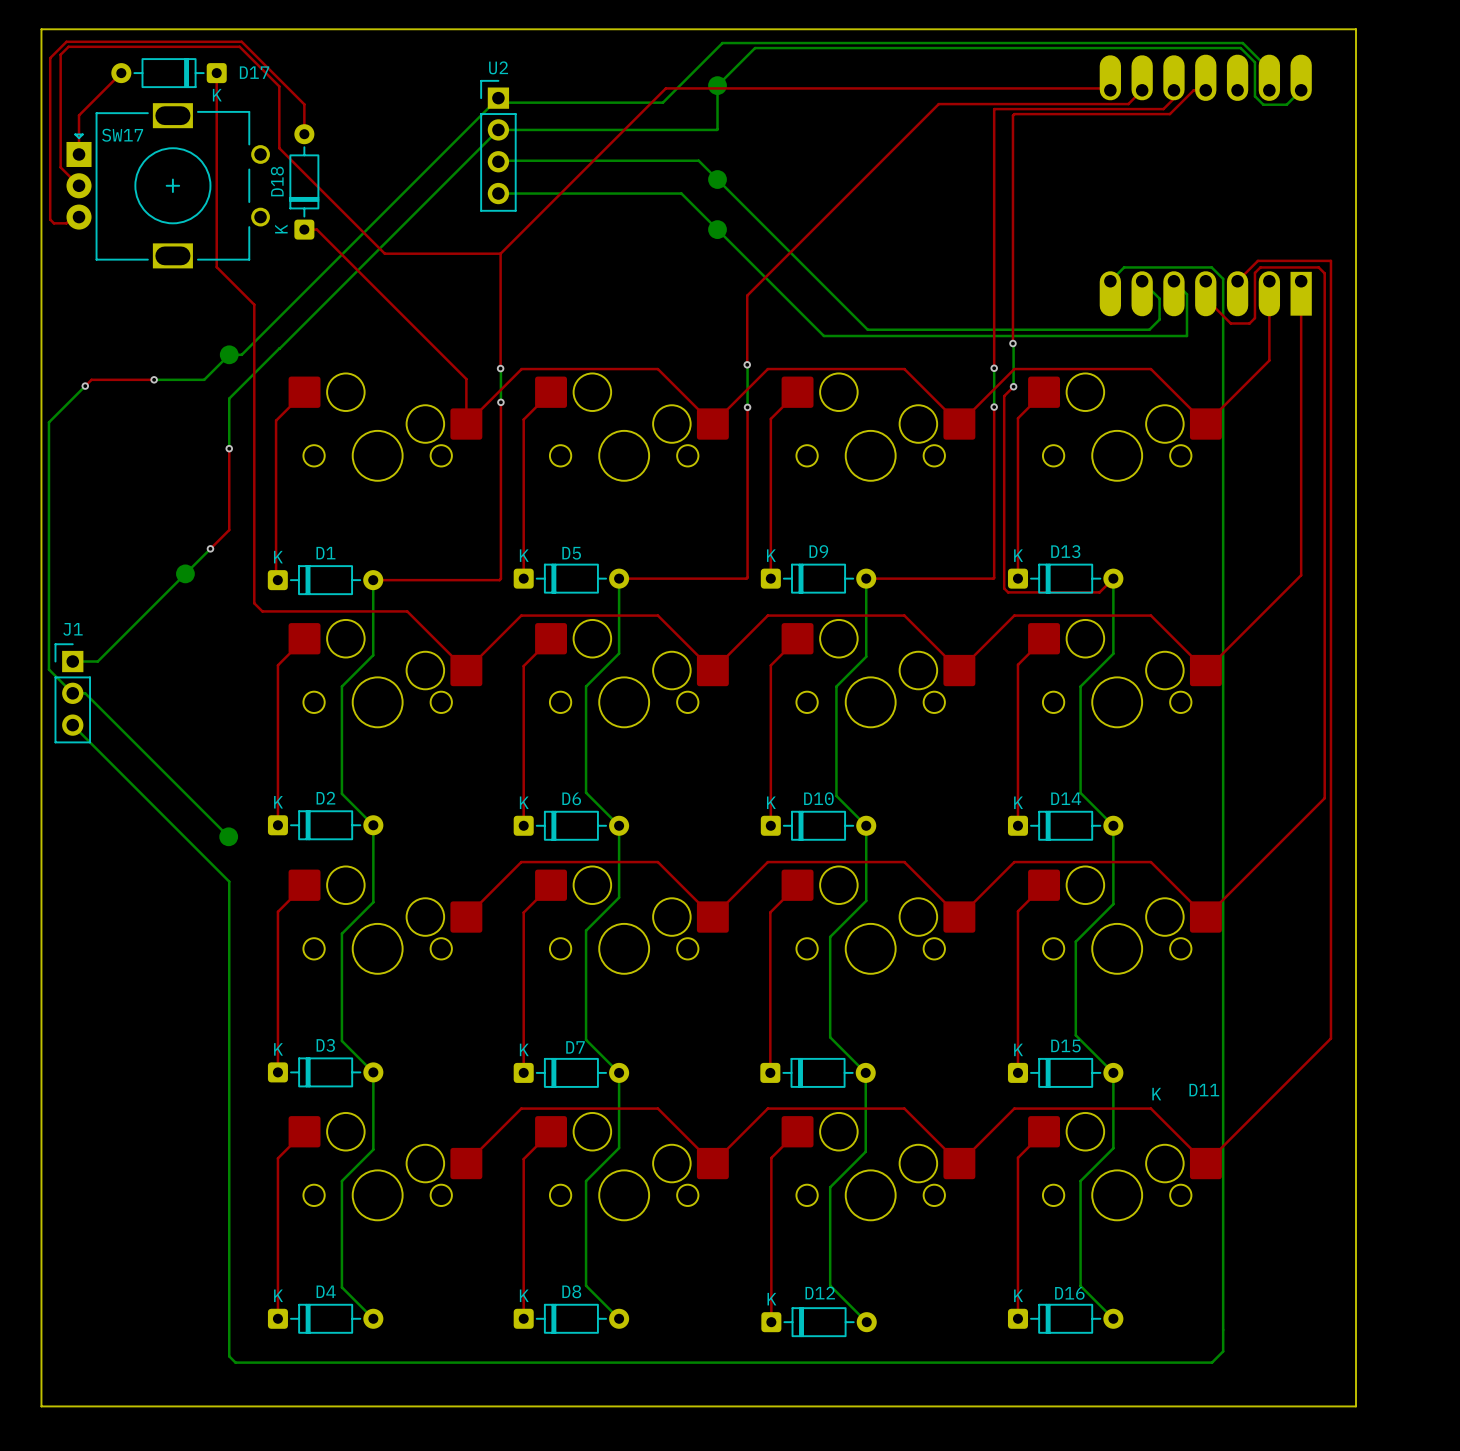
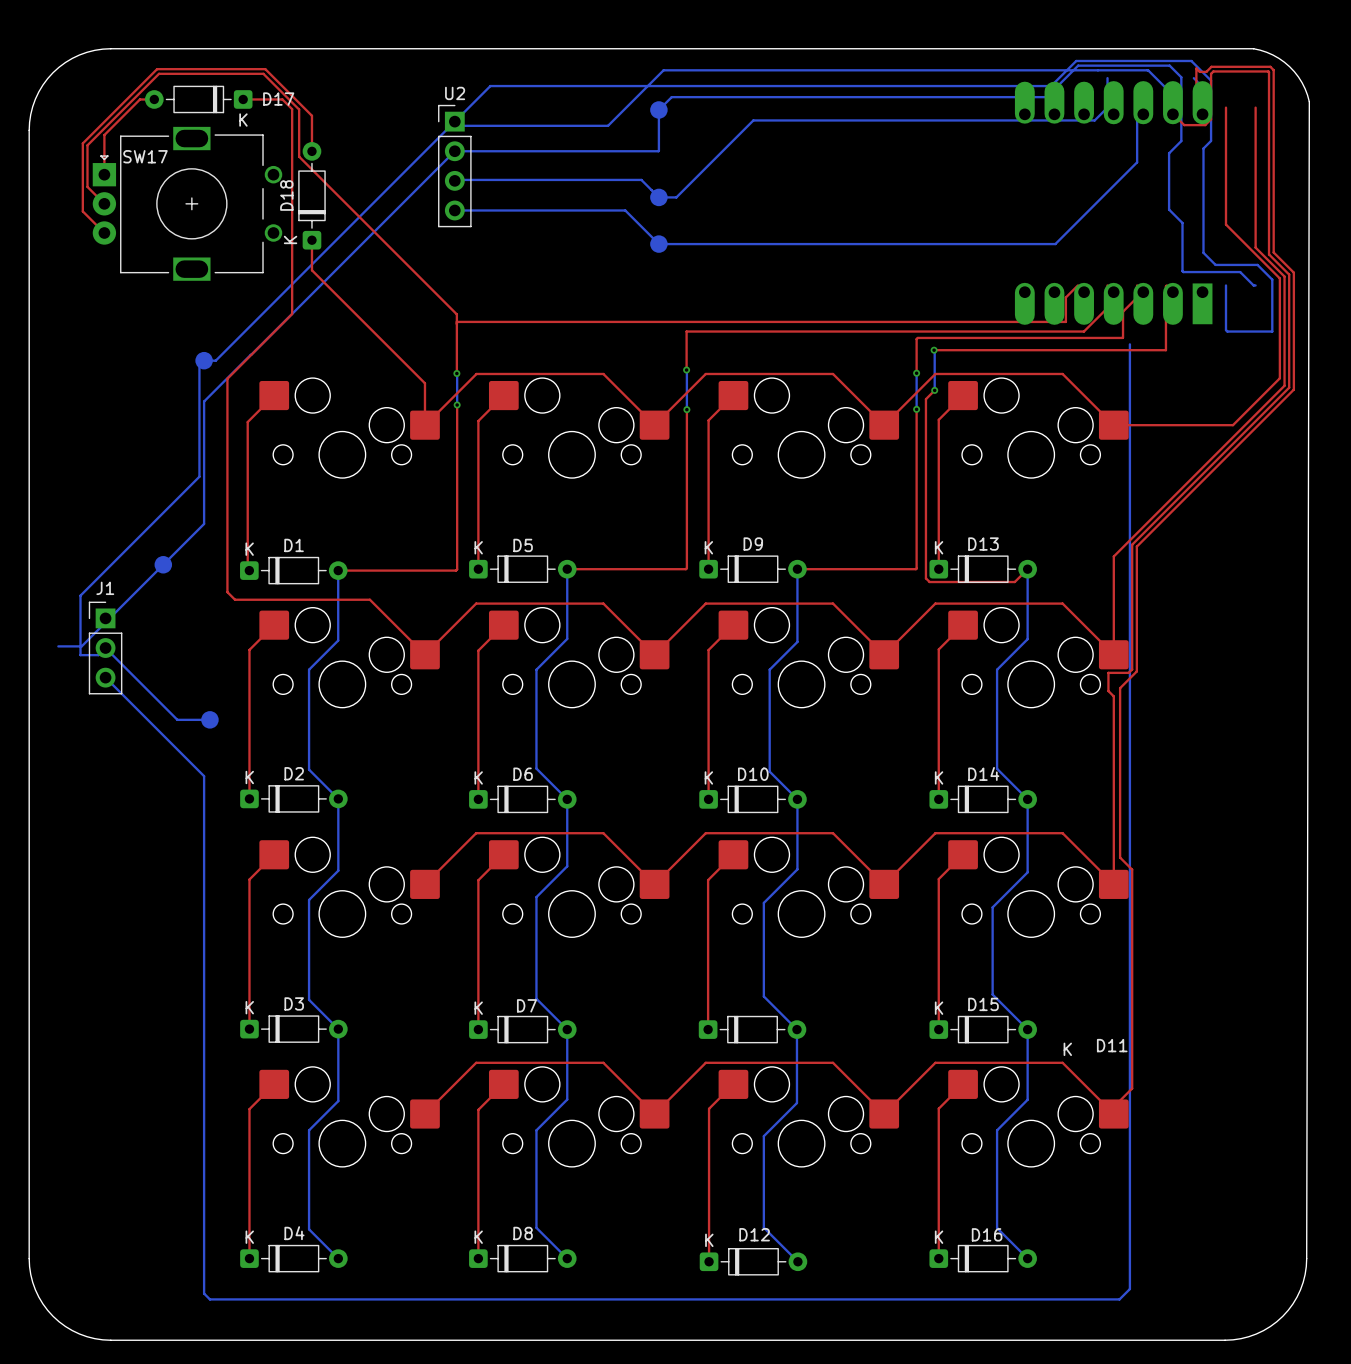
top track: (178, 41) (66, 41) (50, 58) (50, 219) (53, 223) (66, 223) (72, 217) (79, 217) -> (157, 69) (82, 143) (82, 211) (104, 232)
top track: (241, 41) (304, 104) (304, 134) -> (215, 69) (265, 69) (311, 115) (311, 151)
top track: (180, 46) (68, 46) (60, 54) (60, 167) (79, 185) -> (159, 73) (87, 145) (87, 186) (104, 203)
top track: (239, 46) (279, 86) (279, 148) (384, 253) (500, 253) -> (213, 73) (263, 73) (299, 109) (299, 156) (456, 314)
bottom track: none -> (1193, 78) (1197, 81)
bottom track: (731, 71) (755, 48) (1240, 48) (1254, 62) (1254, 96) (1263, 104) (1286, 104) (1301, 90) -> (671, 97) (1046, 97) (1078, 65) (1169, 65) (1181, 77) (1181, 141) (1169, 153) (1169, 209) (1182, 223) (1182, 271) (1240, 272) (1255, 285)
top track: (121, 73) (79, 115) (79, 154) -> none
D17 position: (169, 73) -> (198, 99)
top track: (216, 73) (216, 267) (254, 304) (254, 374) -> (243, 99) (282, 99) (292, 109) (292, 314) (227, 378)
top track: none -> (154, 99) (139, 99) (104, 135) (104, 174)
top track: (1110, 90) (1108, 88) (665, 88) (500, 253) -> none
top track: (1142, 90) (1128, 104) (938, 104) (747, 295) (747, 323) -> (1107, 285) (1107, 307) (1083, 331) (686, 331)
top track: (1173, 90) (1173, 98) (1163, 109) (994, 109) (994, 331) -> (1137, 285) (1137, 297) (1123, 311) (1122, 337) (916, 339)
top track: (1205, 90) (1193, 90) (1169, 114) (1014, 114) (1012, 115) (1012, 343) -> (1166, 285) (1165, 350) (934, 350)
bottom track: none -> (454, 121) (490, 86) (1051, 86) (1076, 60) (1191, 60) (1211, 80) (1211, 140) (1203, 148) (1203, 252) (1215, 264) (1257, 264) (1272, 279) (1272, 331) (1227, 331) (1225, 285)
board edge: (41, 107) (41, 29) (1356, 29) (1356, 1406) (1325, 1406) -> (29, 130) (30, 114) (35, 99) (47, 78) (59, 67) (72, 58) (87, 52) (102, 49) (1253, 48) (1272, 55) (1289, 66) (1302, 82) (1309, 101) (1306, 1266) (1303, 1282) (1297, 1297) (1288, 1310) (1276, 1321) (1256, 1334) (1240, 1338) (1225, 1340)
bottom track: (717, 179) (867, 329) (1149, 329) (1159, 319) (1159, 298) (1142, 281) -> (658, 197) (676, 197) (753, 120) (1094, 120) (1107, 107) (1107, 78)
D18 position: (304, 181) -> (311, 195)
SW17 position: (168, 185) -> (187, 203)
top track: (304, 229) (316, 229) (345, 257) -> (311, 240) (311, 270)
bottom track: (717, 229) (823, 336) (1186, 336) (1186, 294) (1173, 281) (1174, 293) -> (658, 244) (1055, 244) (1137, 162) (1137, 107)
top track: (500, 253) (500, 305) -> none
top track: none -> (1077, 285) (1065, 297) (1065, 321) (456, 321)
top track: (1205, 281) (1205, 298) (1230, 323) (1249, 323) (1254, 318) (1254, 272) (1260, 267) (1318, 267) (1324, 273) (1324, 798) (1205, 917) -> (1166, 107) (1184, 125) (1205, 125) (1211, 119) (1211, 73) (1213, 71) (1269, 72) (1269, 254) (1289, 274) (1289, 387) (1132, 544) (1132, 669) (1128, 672) (1108, 672) (1108, 691) (1113, 696) (1113, 884)
top track: (1237, 281) (1257, 260) (1330, 260) (1330, 1038) (1205, 1163) -> (1196, 107) (1196, 68) (1199, 71) (1206, 71) (1211, 66) (1270, 66) (1273, 70) (1273, 252) (1293, 272) (1293, 389) (1136, 546) (1136, 671) (1120, 688) (1120, 857) (1132, 869) (1132, 1088) (1113, 1106) (1113, 1114)
top track: (1269, 281) (1269, 360) (1205, 424) -> (1225, 107) (1225, 224) (1279, 278) (1279, 378) (1232, 425) (1113, 425)
top track: (1301, 281) (1301, 575) (1205, 670) -> (1255, 107) (1255, 247) (1284, 276) (1284, 385) (1113, 556) (1113, 654)
bottom track: (1105, 285) (1124, 267) (1211, 267) (1223, 278) (1223, 337) -> none
bottom track: (224, 359) (204, 379) (154, 379) -> (199, 365) (199, 476) (80, 595) (80, 655) (98, 655) (105, 648) (177, 719) (209, 719)
top track: (154, 379) (91, 379) (85, 386) -> none
via: (154, 379) -> none
bottom track: (85, 386) (48, 422) (48, 669) (72, 693) (85, 693) (228, 836) -> none
via: (85, 386) -> none
top track: (229, 448) (229, 530) (210, 548) -> none
bottom track: none -> (204, 448) (204, 523) (186, 541)
via: (229, 448) -> none
via: (210, 548) -> none
J1 position: (72, 693) -> (105, 648)
bottom track: (72, 725) (229, 881) -> (105, 677) (204, 776) (204, 851)
part position: (228, 836) -> (209, 719)
board edge: (41, 1318) (41, 1406) (129, 1406) -> (29, 1258) (30, 1274) (35, 1289) (42, 1303) (53, 1316) (65, 1326) (79, 1334) (94, 1338) (110, 1340)

